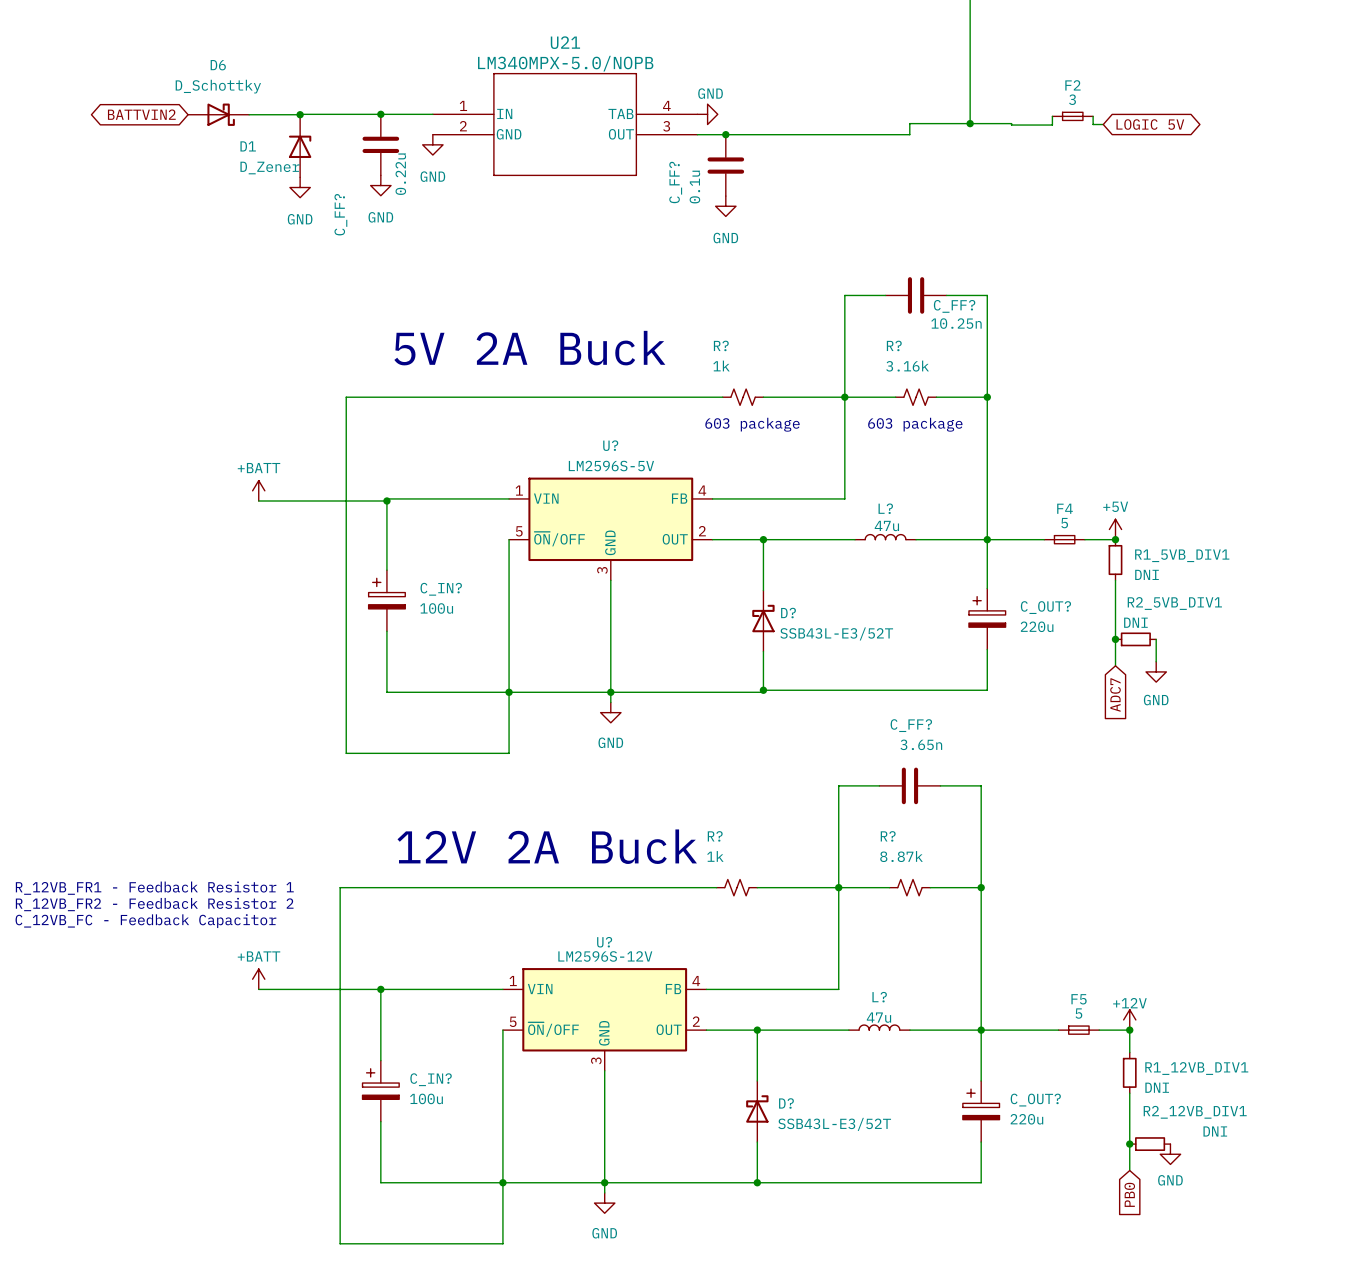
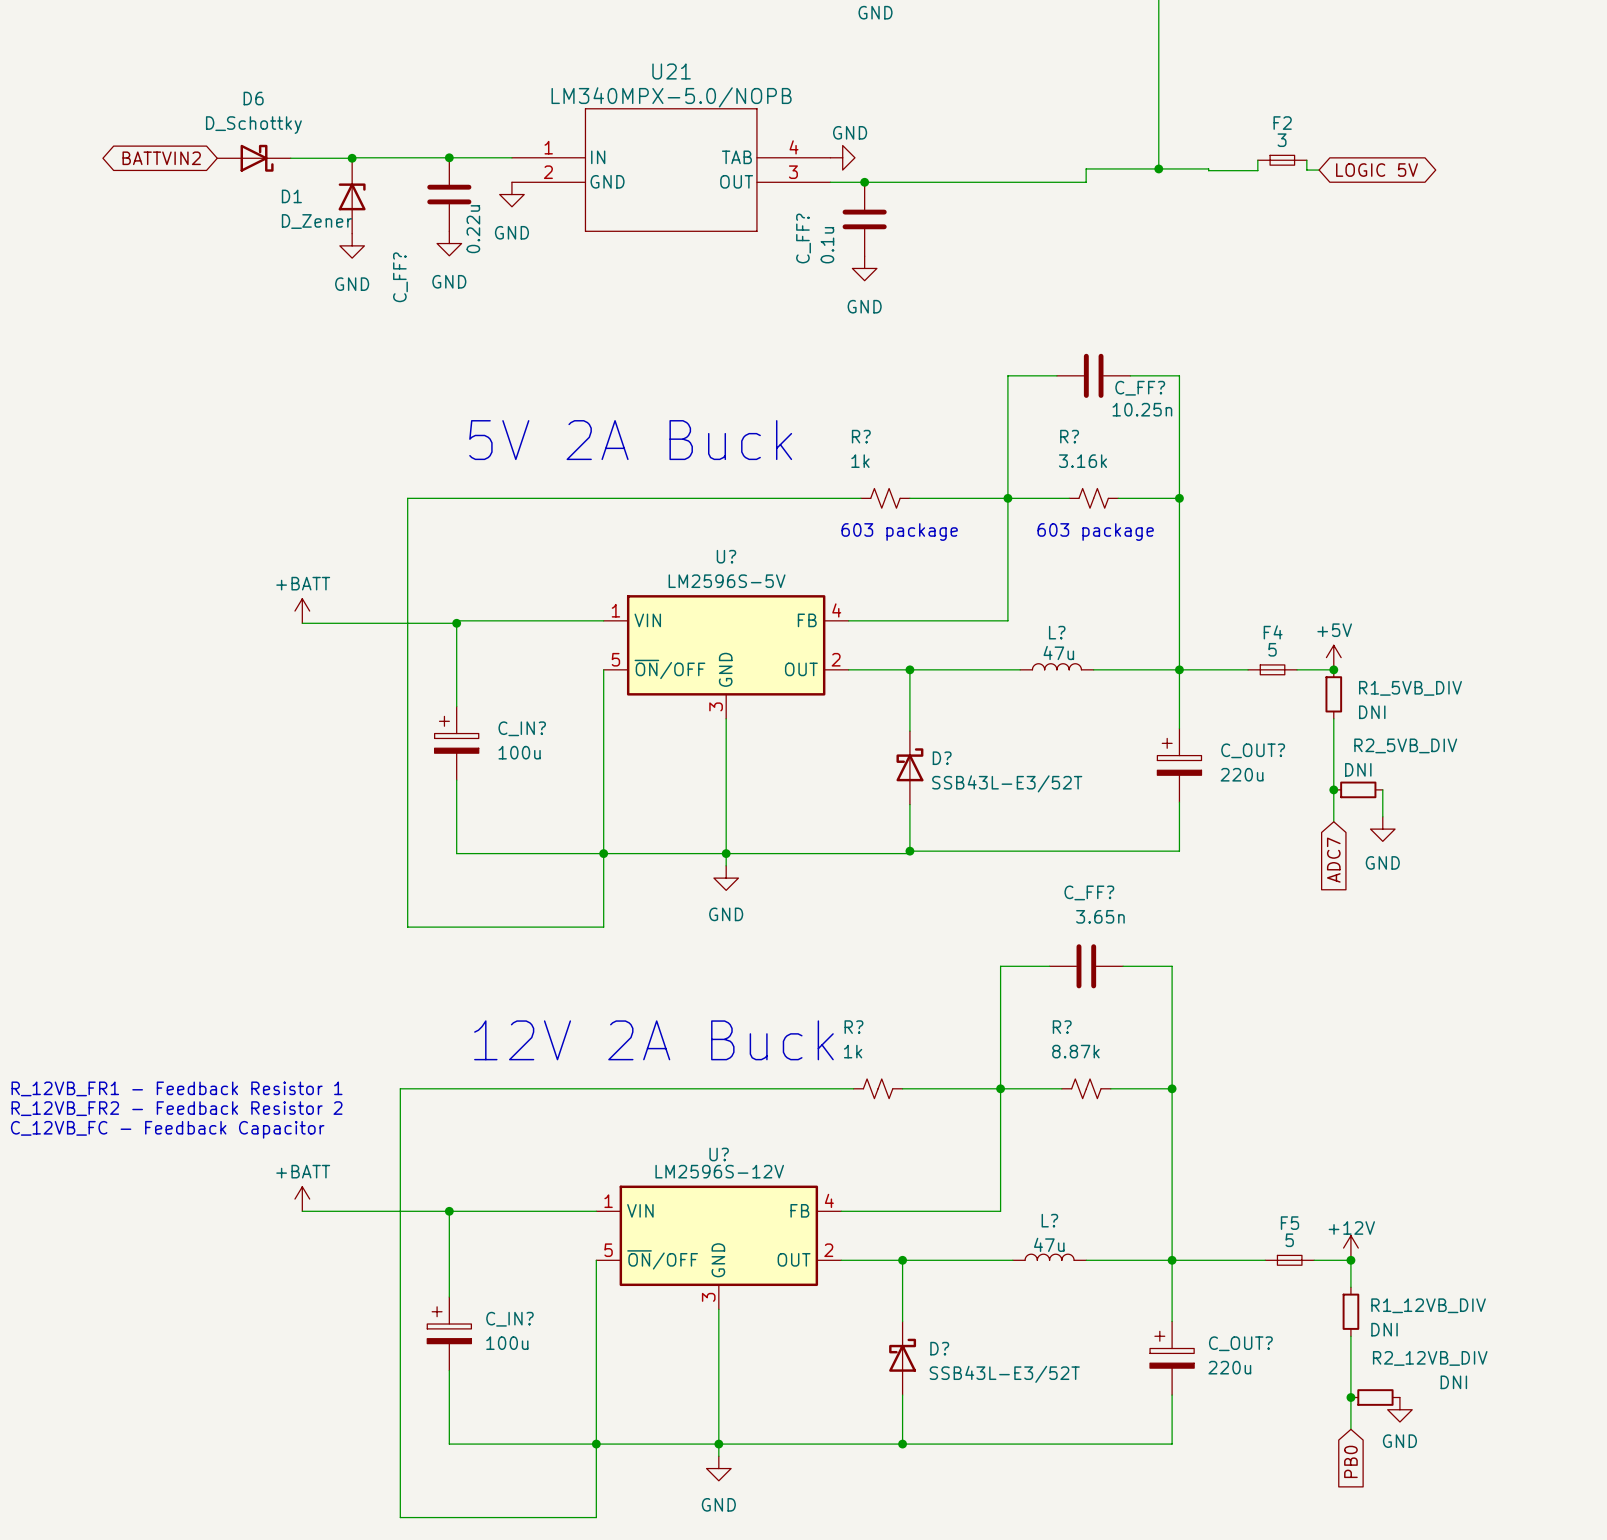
R1_5VB_DIV1 name: R1_5VB_DIV1 (1182, 555) -> R1_5VB_DIV (1410, 688)
R2_5VB_DIV1 name: R2_5VB_DIV1 (1174, 603) -> R2_5VB_DIV (1405, 745)
R1_12VB_DIV1 name: R1_12VB_DIV1 (1196, 1068) -> R1_12VB_DIV (1428, 1305)
R2_12VB_DIV1 name: R2_12VB_DIV1 (1195, 1112) -> R2_12VB_DIV (1430, 1358)

